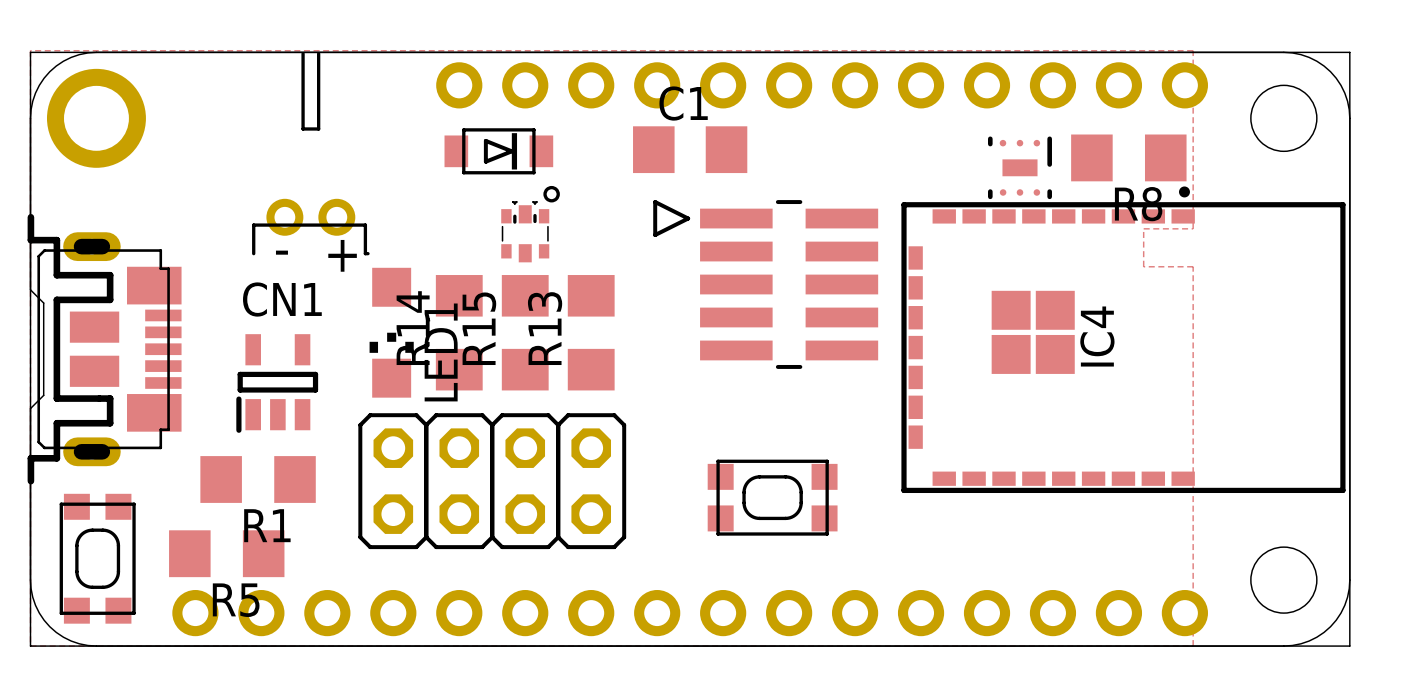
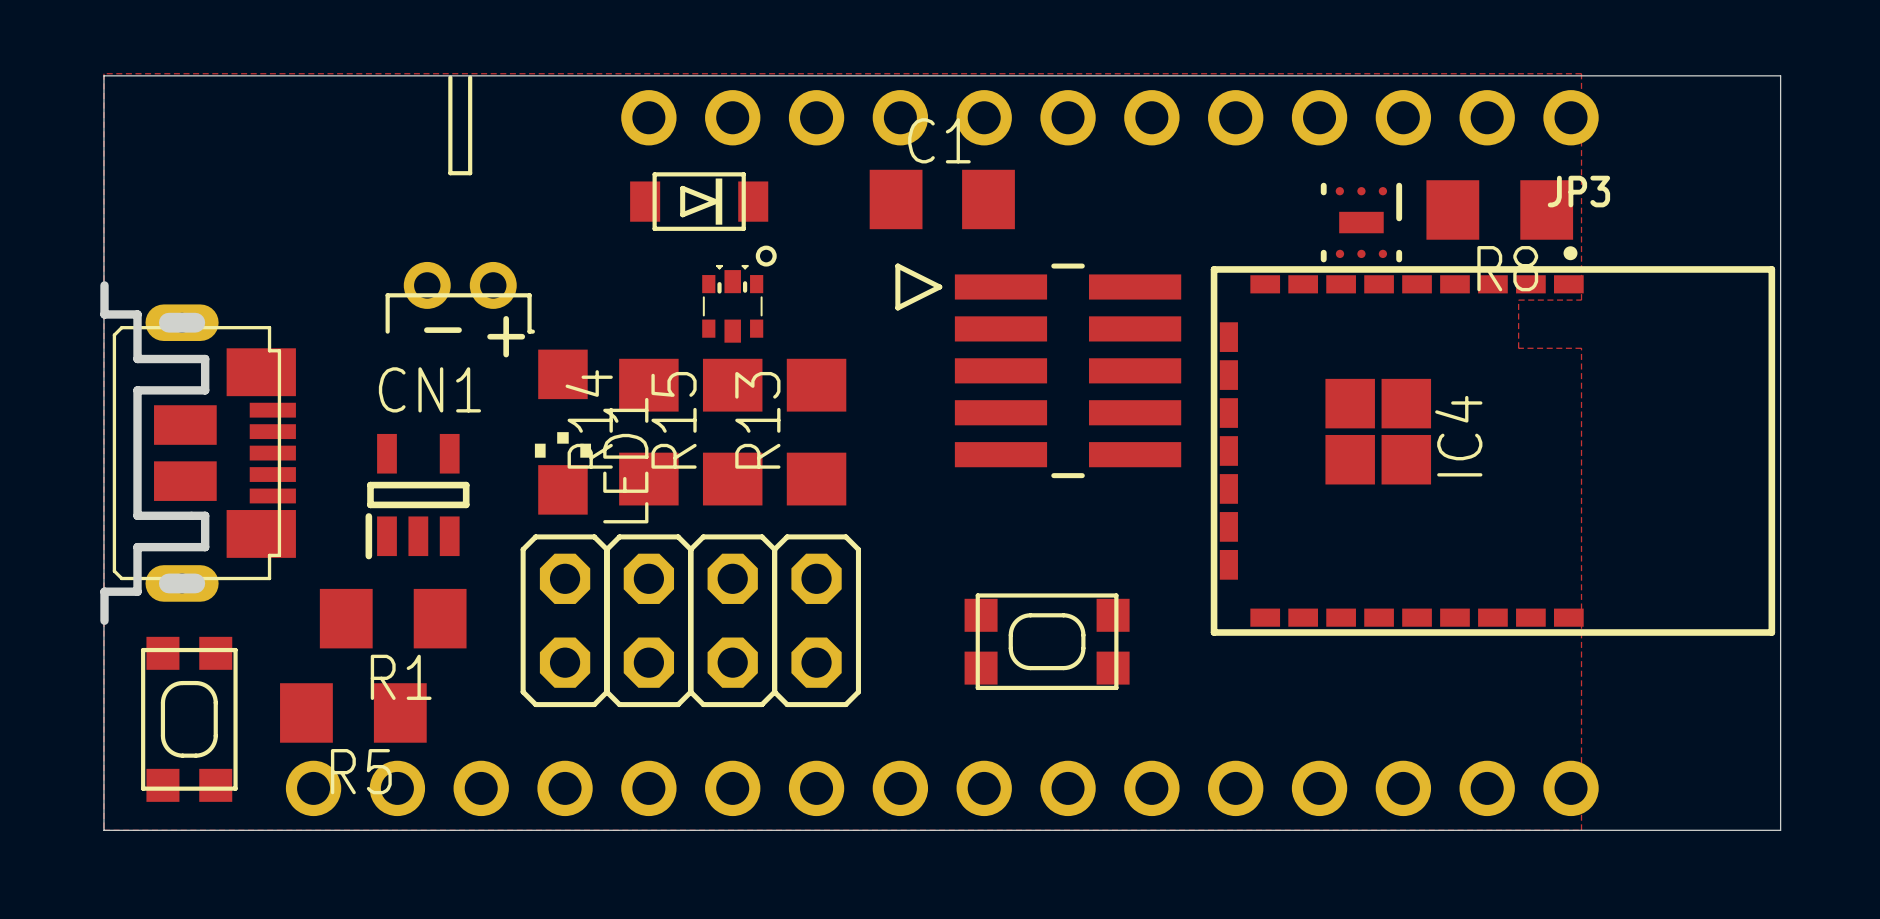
JP3: none -> (1109, 117)
part: (690, 349) -> none
part: none -> (942, 788)

